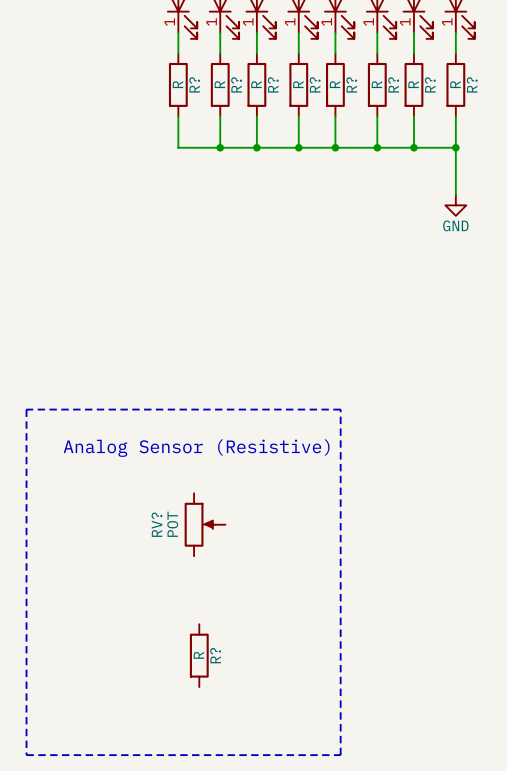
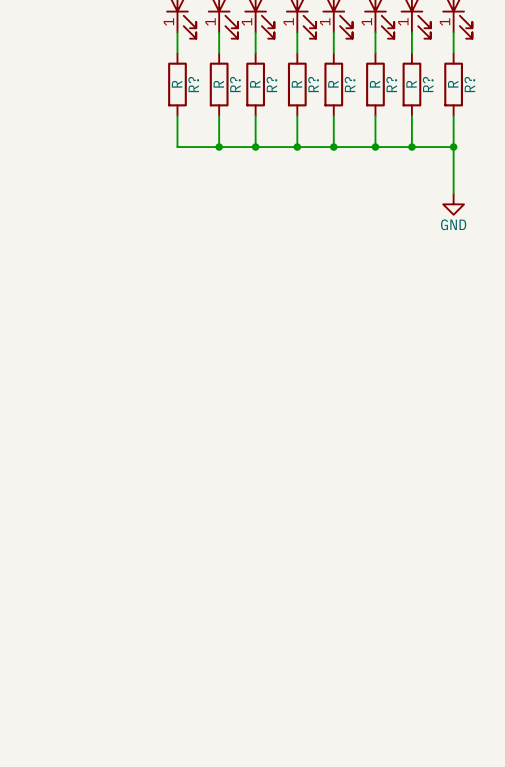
line: (26, 409) (26, 755) (340, 755) (340, 409) (26, 409) -> none
text: Analog Sensor (Resistive) (196, 448) -> none
RV?: POT (205, 524) -> none
R?: R (199, 655) -> none

